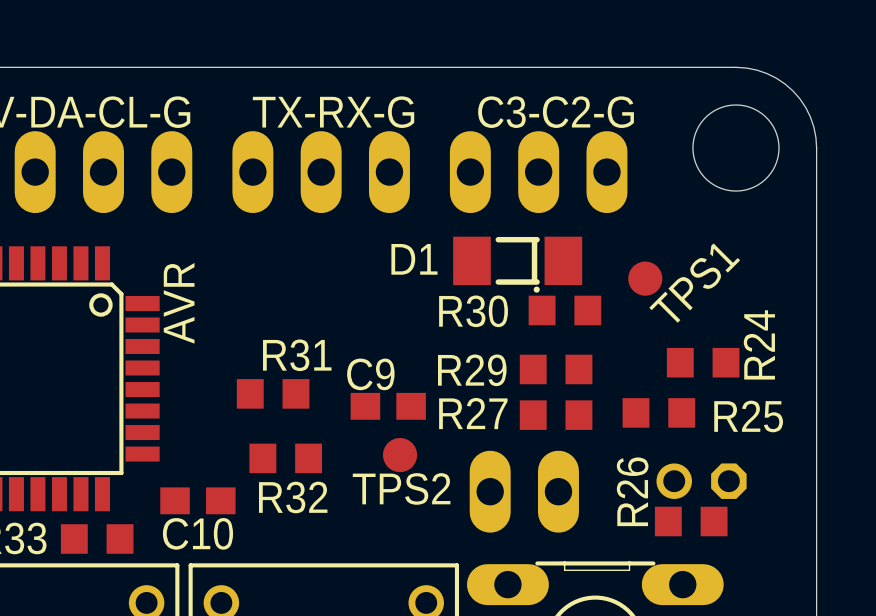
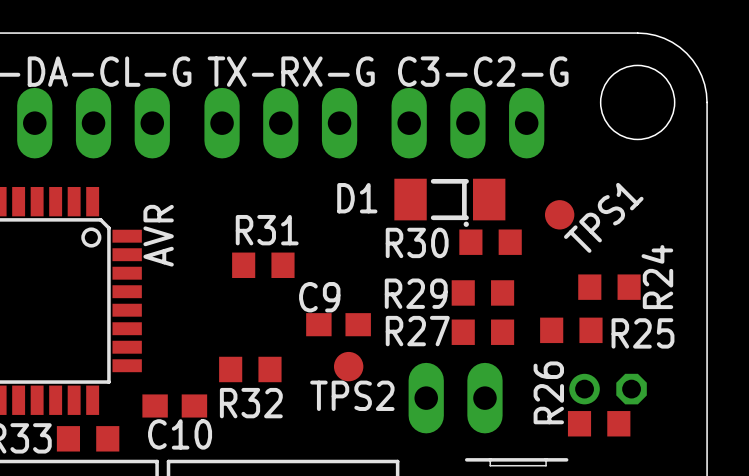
R31 name position: R31 (297, 355) -> R31 (267, 230)
R31 position: (273, 393) -> (263, 265)

